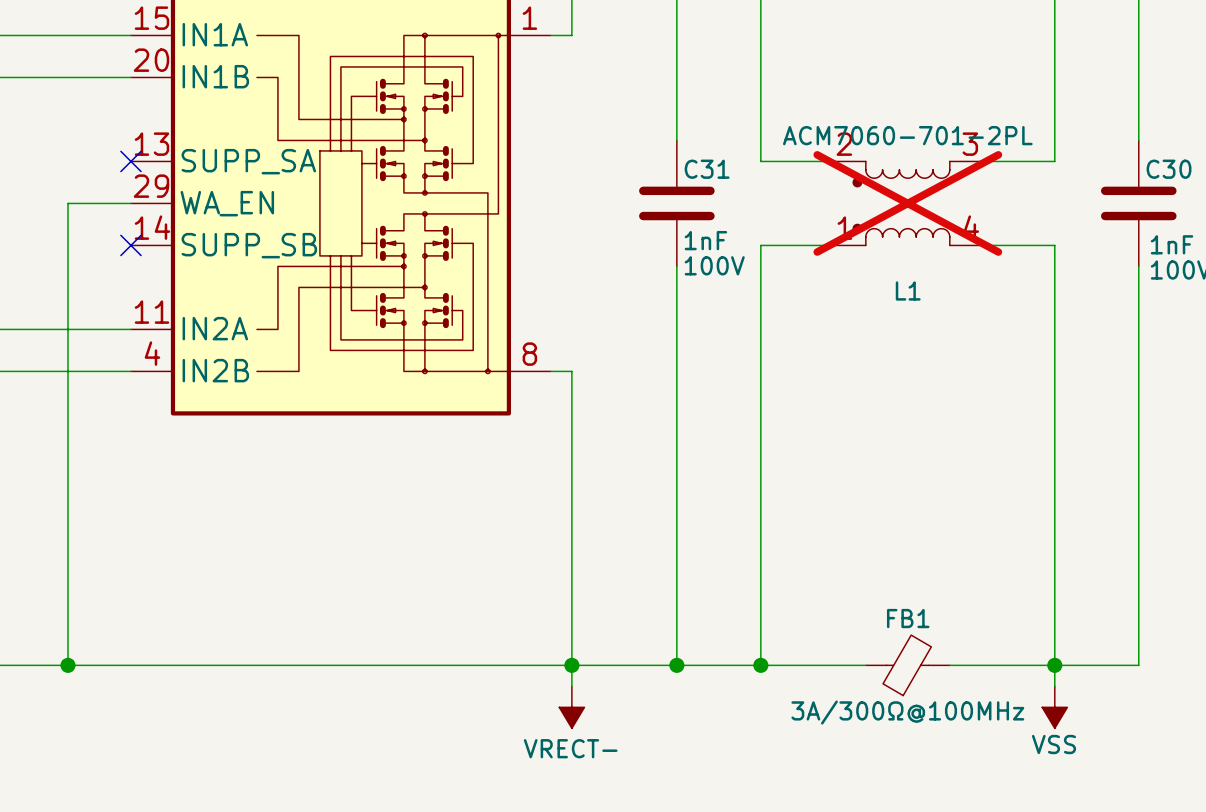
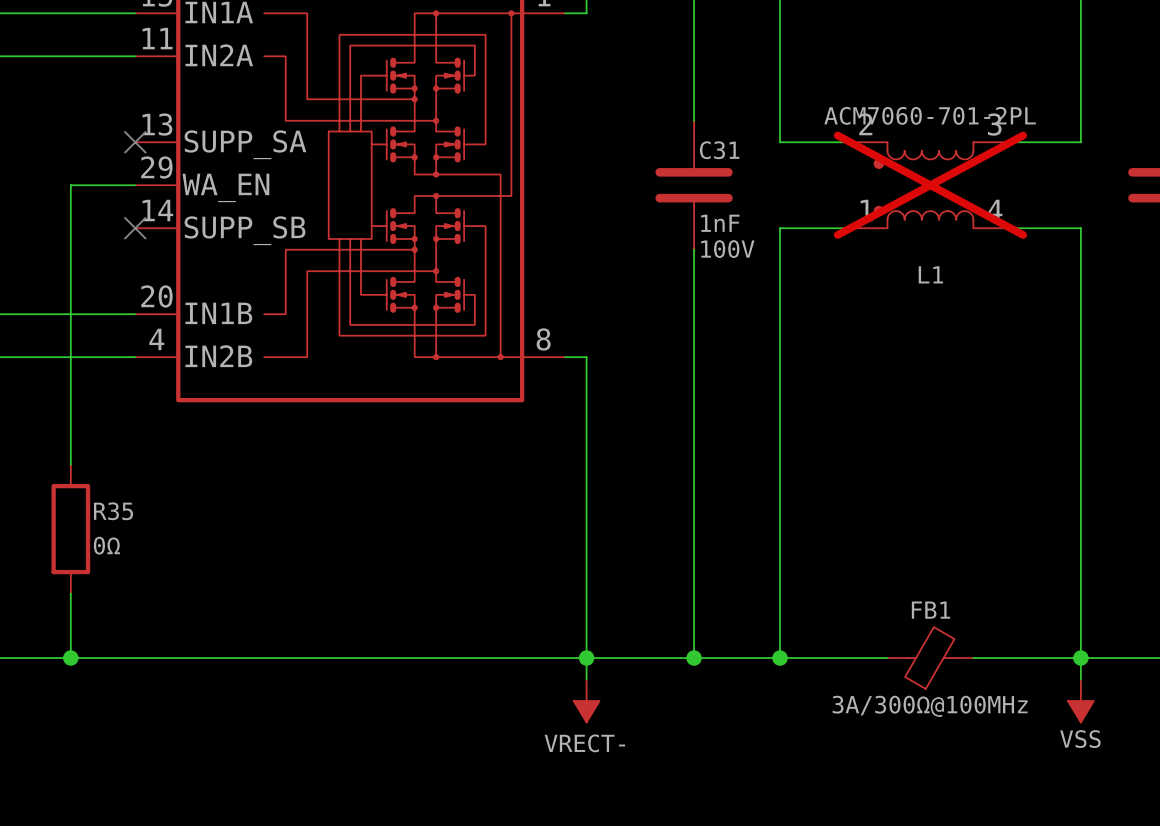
part pin number: 20 (151, 60) -> 11 (157, 38)
part pin name: IN1B (215, 76) -> IN2A (219, 55)
part pin number: 11 (151, 312) -> 20 (156, 296)
part pin name: IN2A (215, 328) -> IN1B (218, 313)
wire: (67, 476) (67, 602) -> none
R35: none -> 0Ω (70, 529)

